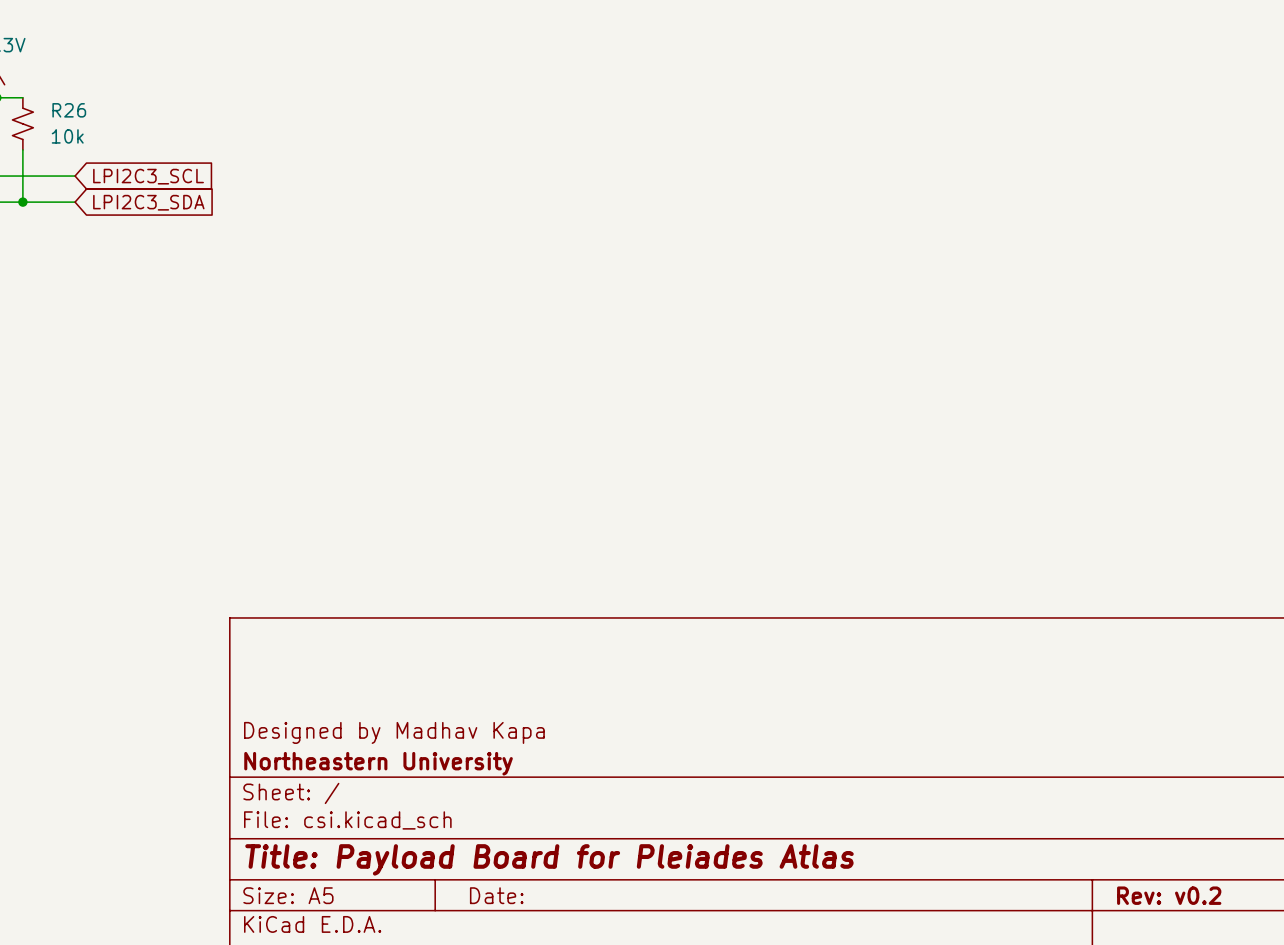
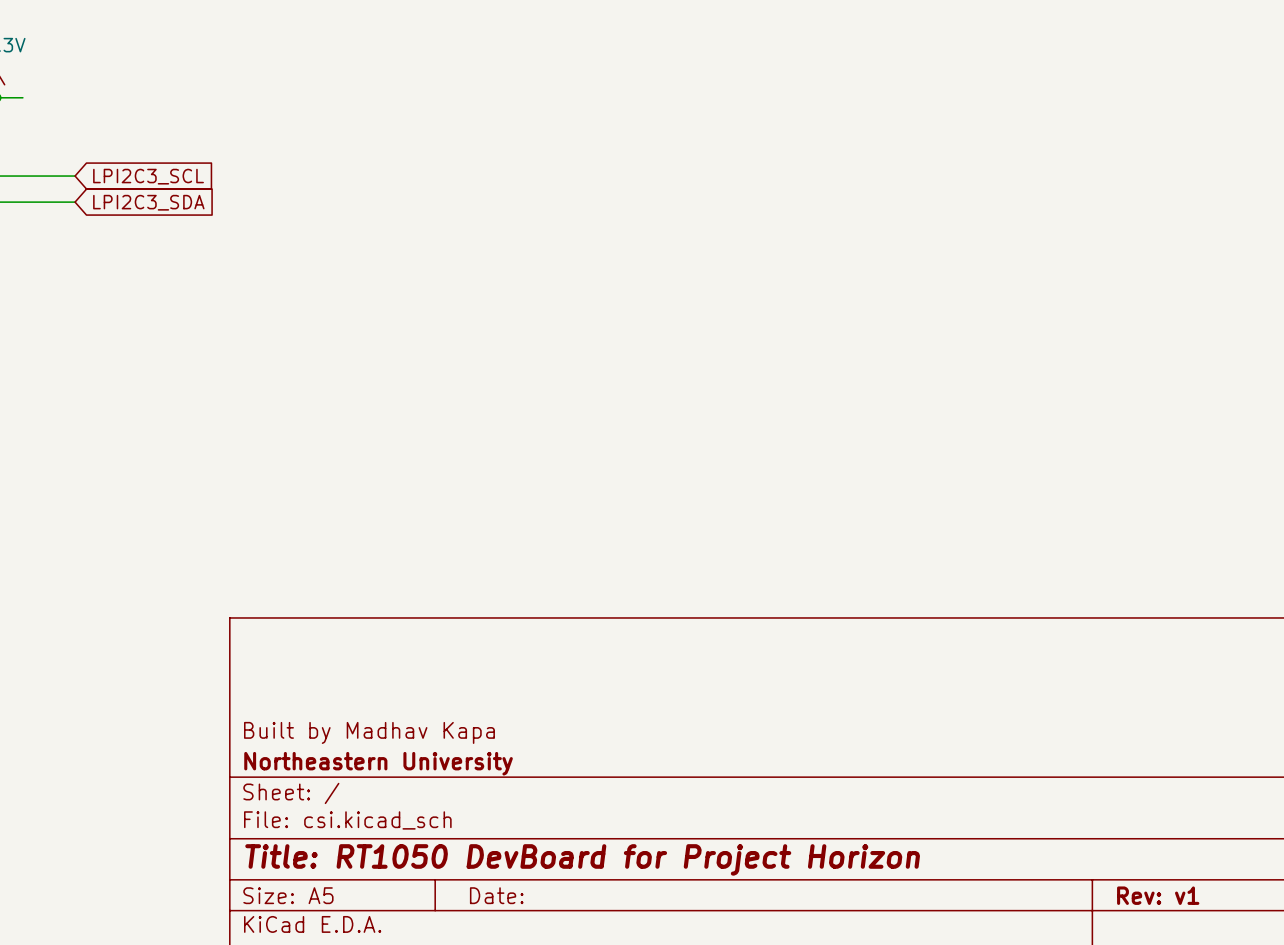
R26: 10k (22, 123) -> none
wire: (22, 149) (22, 202) -> none
junction: (22, 202) -> none
title block: Designed by Madhav Kapa (394, 732) -> Built by Madhav Kapa (369, 732)
title block: Title: Payload Board for Pleiades Atlas (549, 859) -> Title: RT1050 DevBoard for Project Horizon (582, 859)
title block: Rev: v0.2 (1169, 895) -> Rev: v1 (1158, 895)

